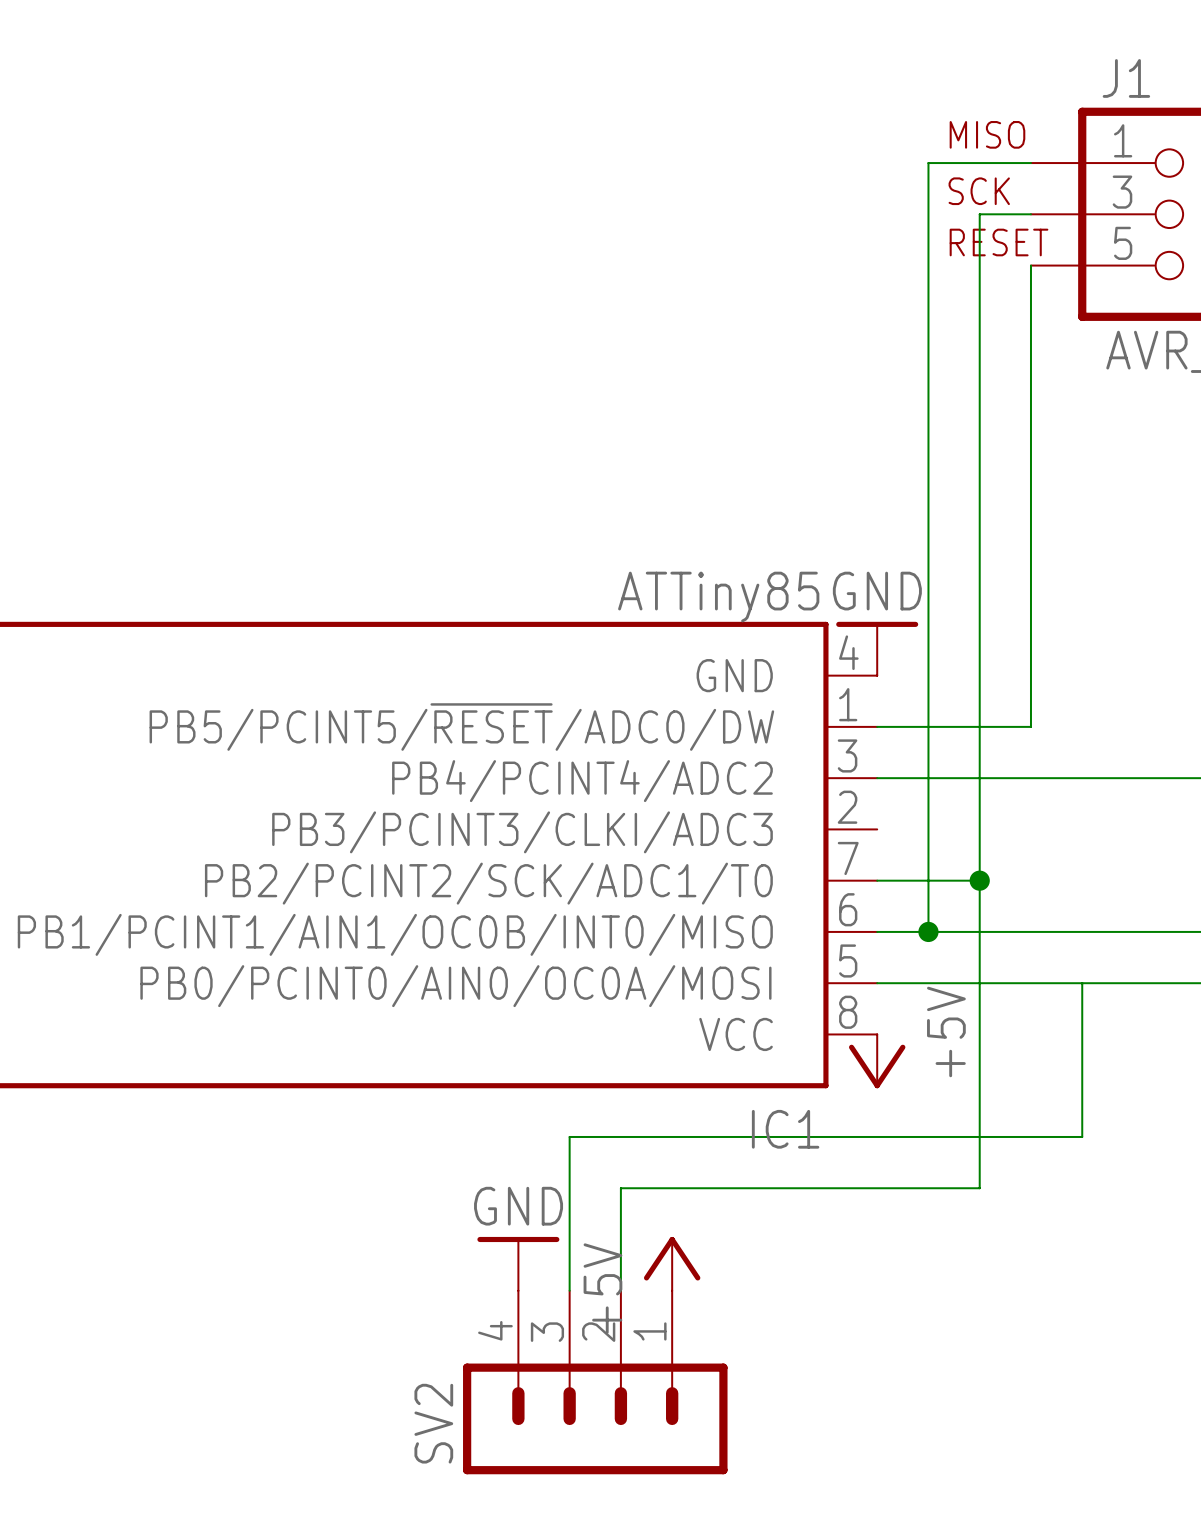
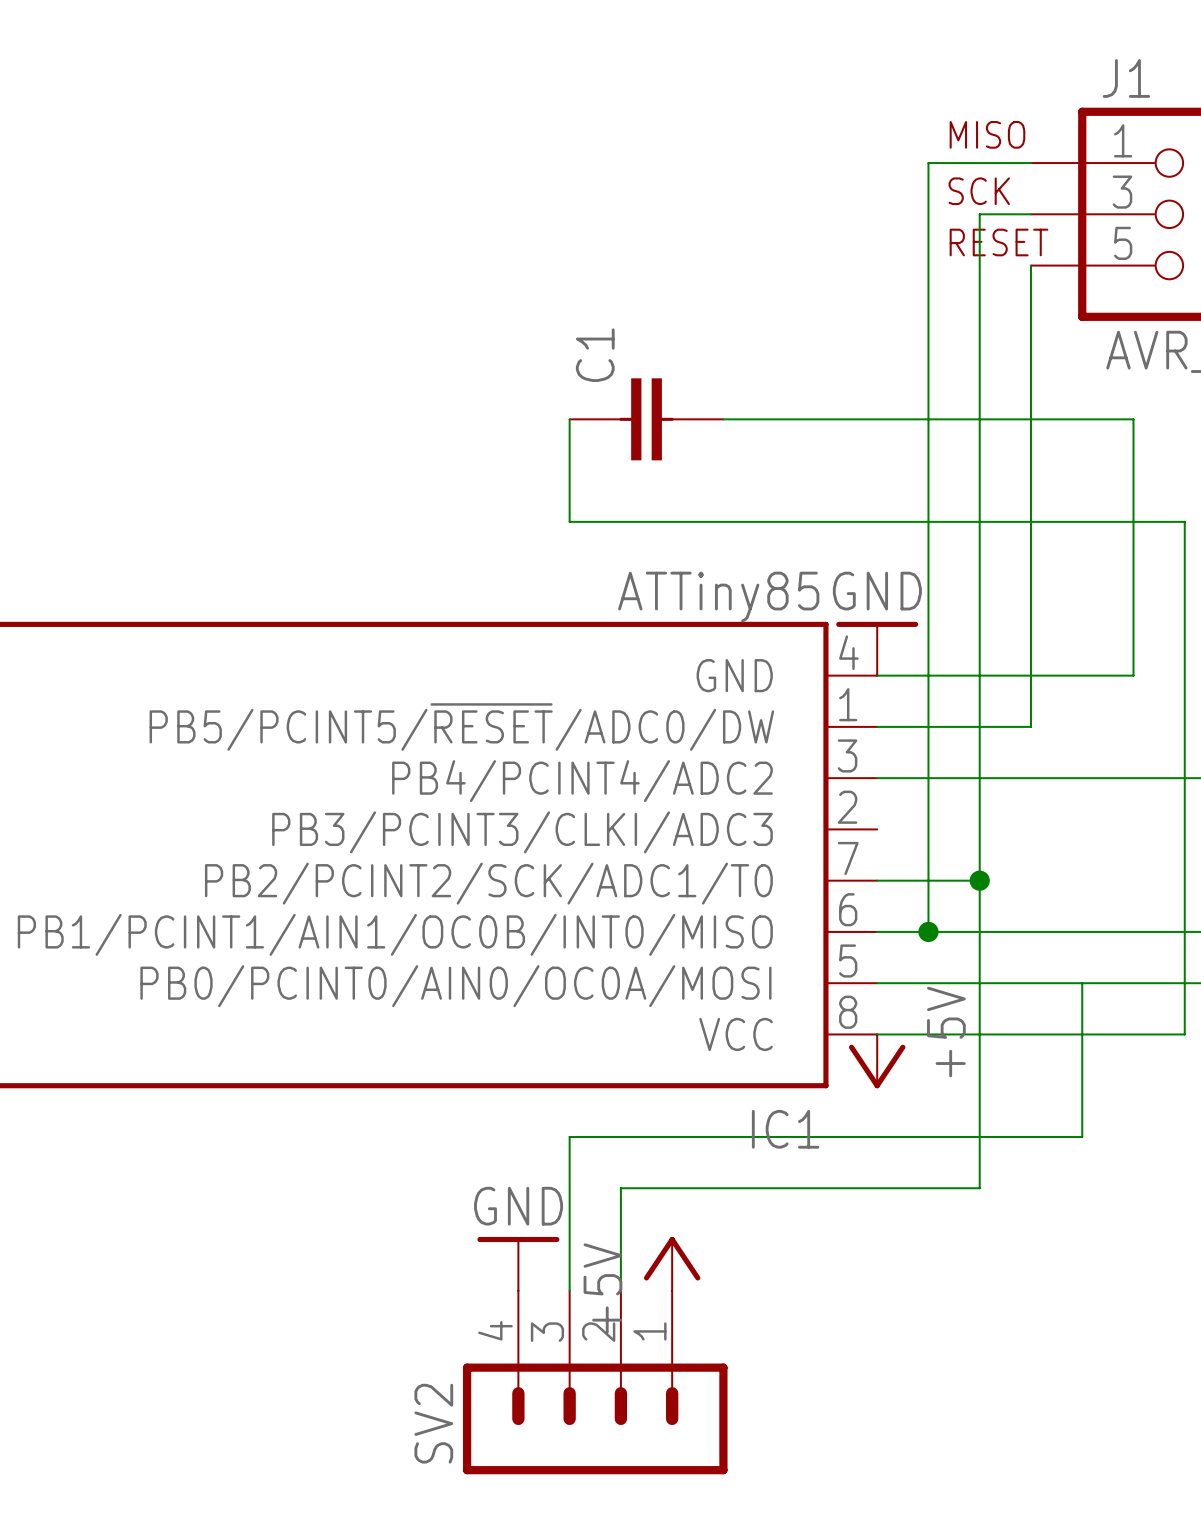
wire: none -> (569, 419) (569, 521) (1184, 521) (1184, 1034) (877, 1034)
C1: none -> (646, 419)
wire: none -> (723, 419) (1133, 419) (1133, 675) (877, 675)

